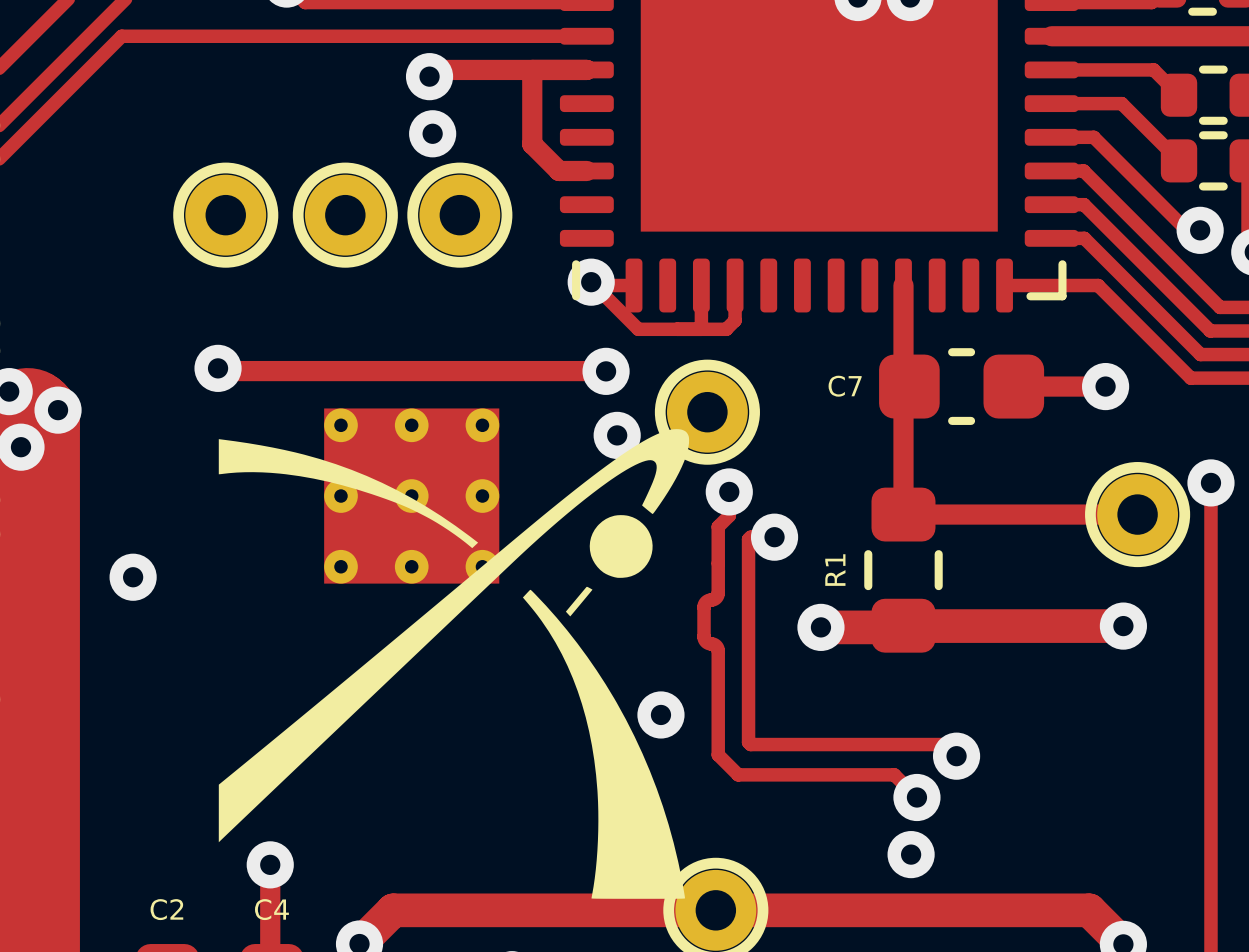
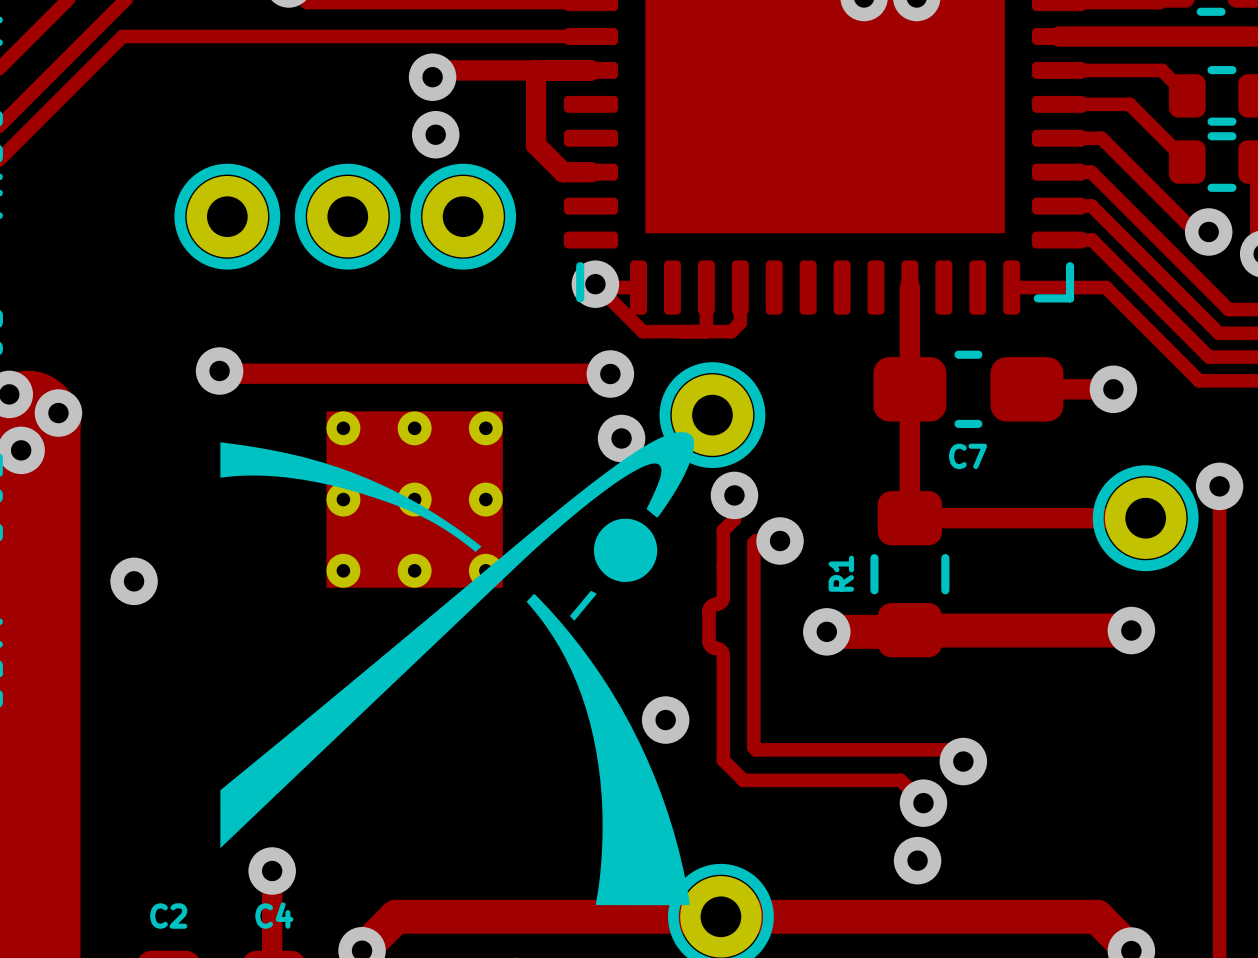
C7 footprint: [879, 348, 1045, 425] -> [873, 350, 1064, 428]
C7 name position: C7 (845, 386) -> C7 (968, 456)

